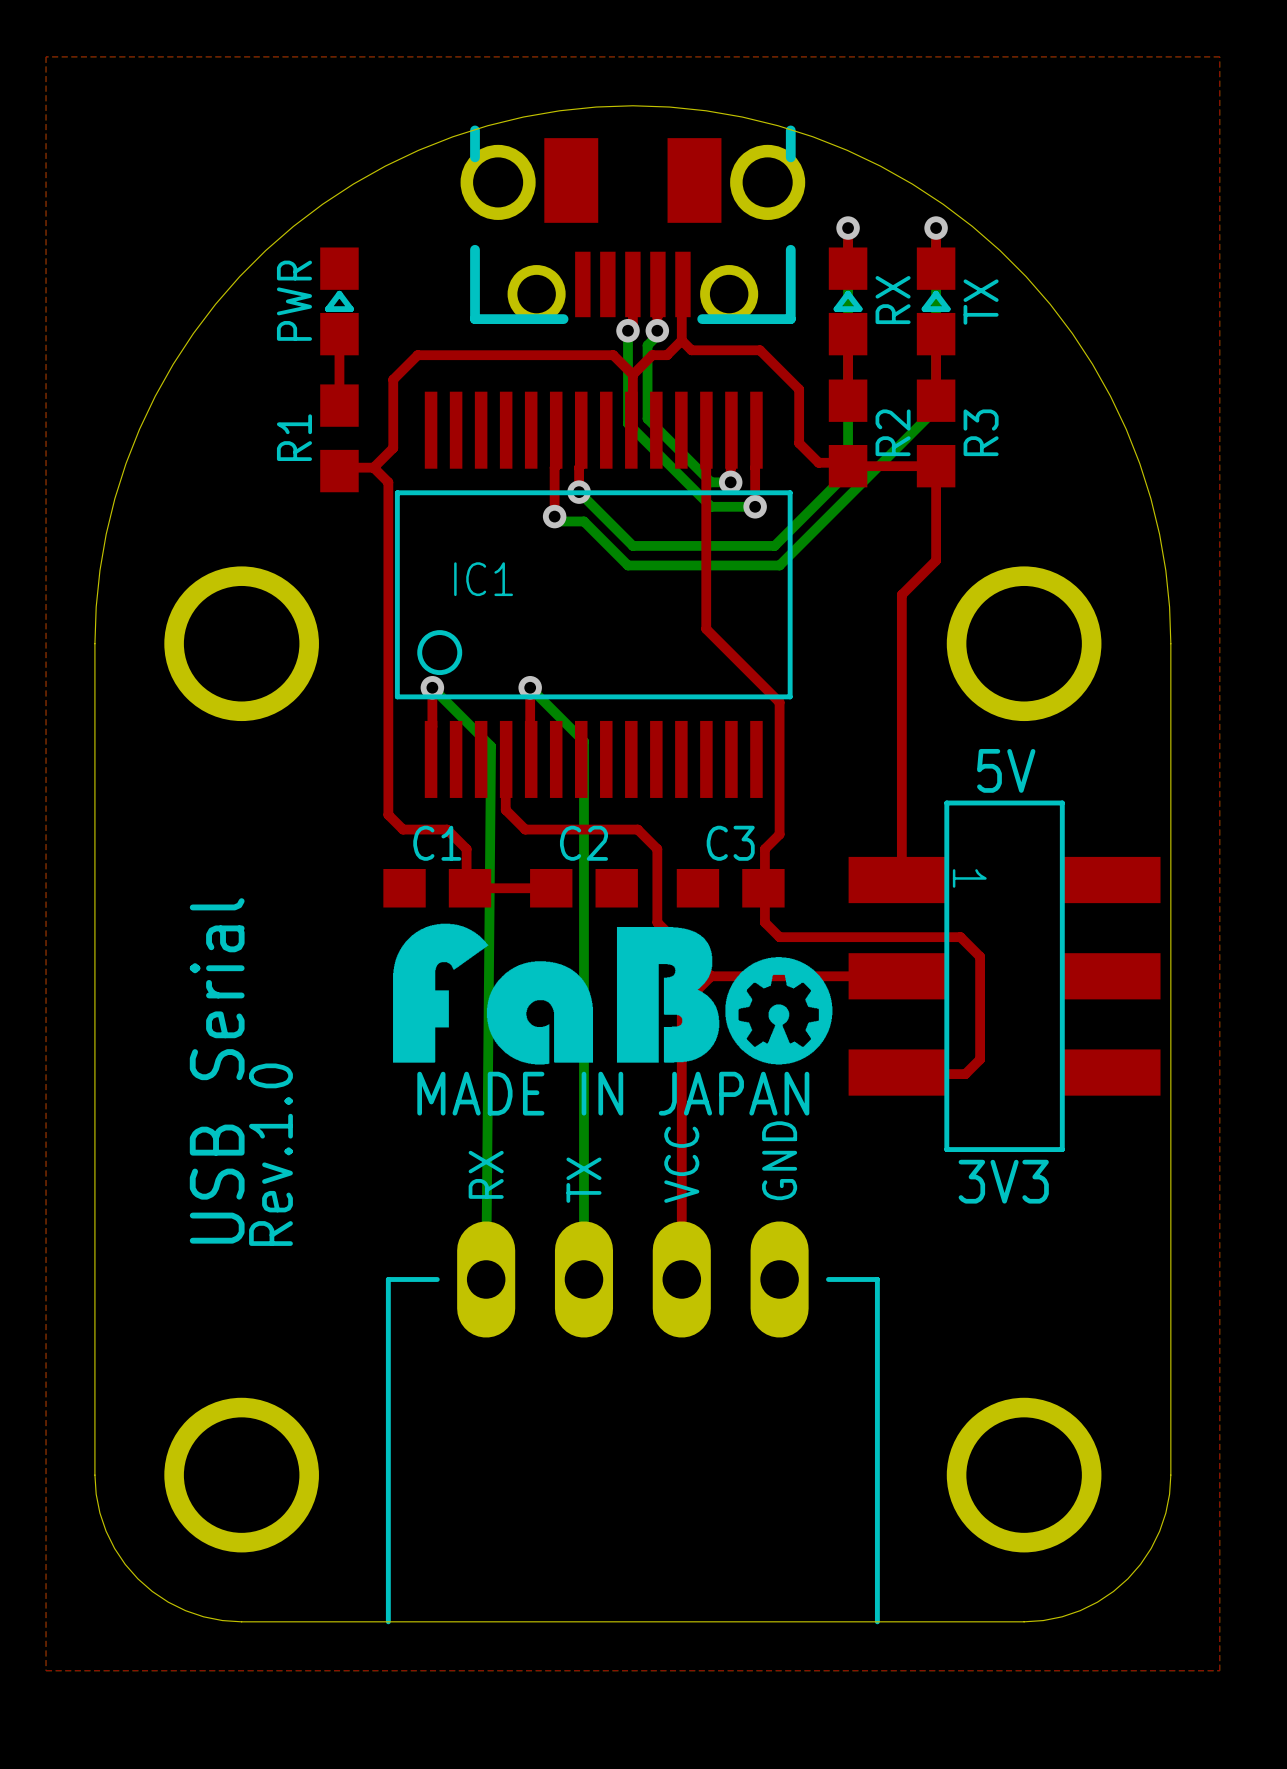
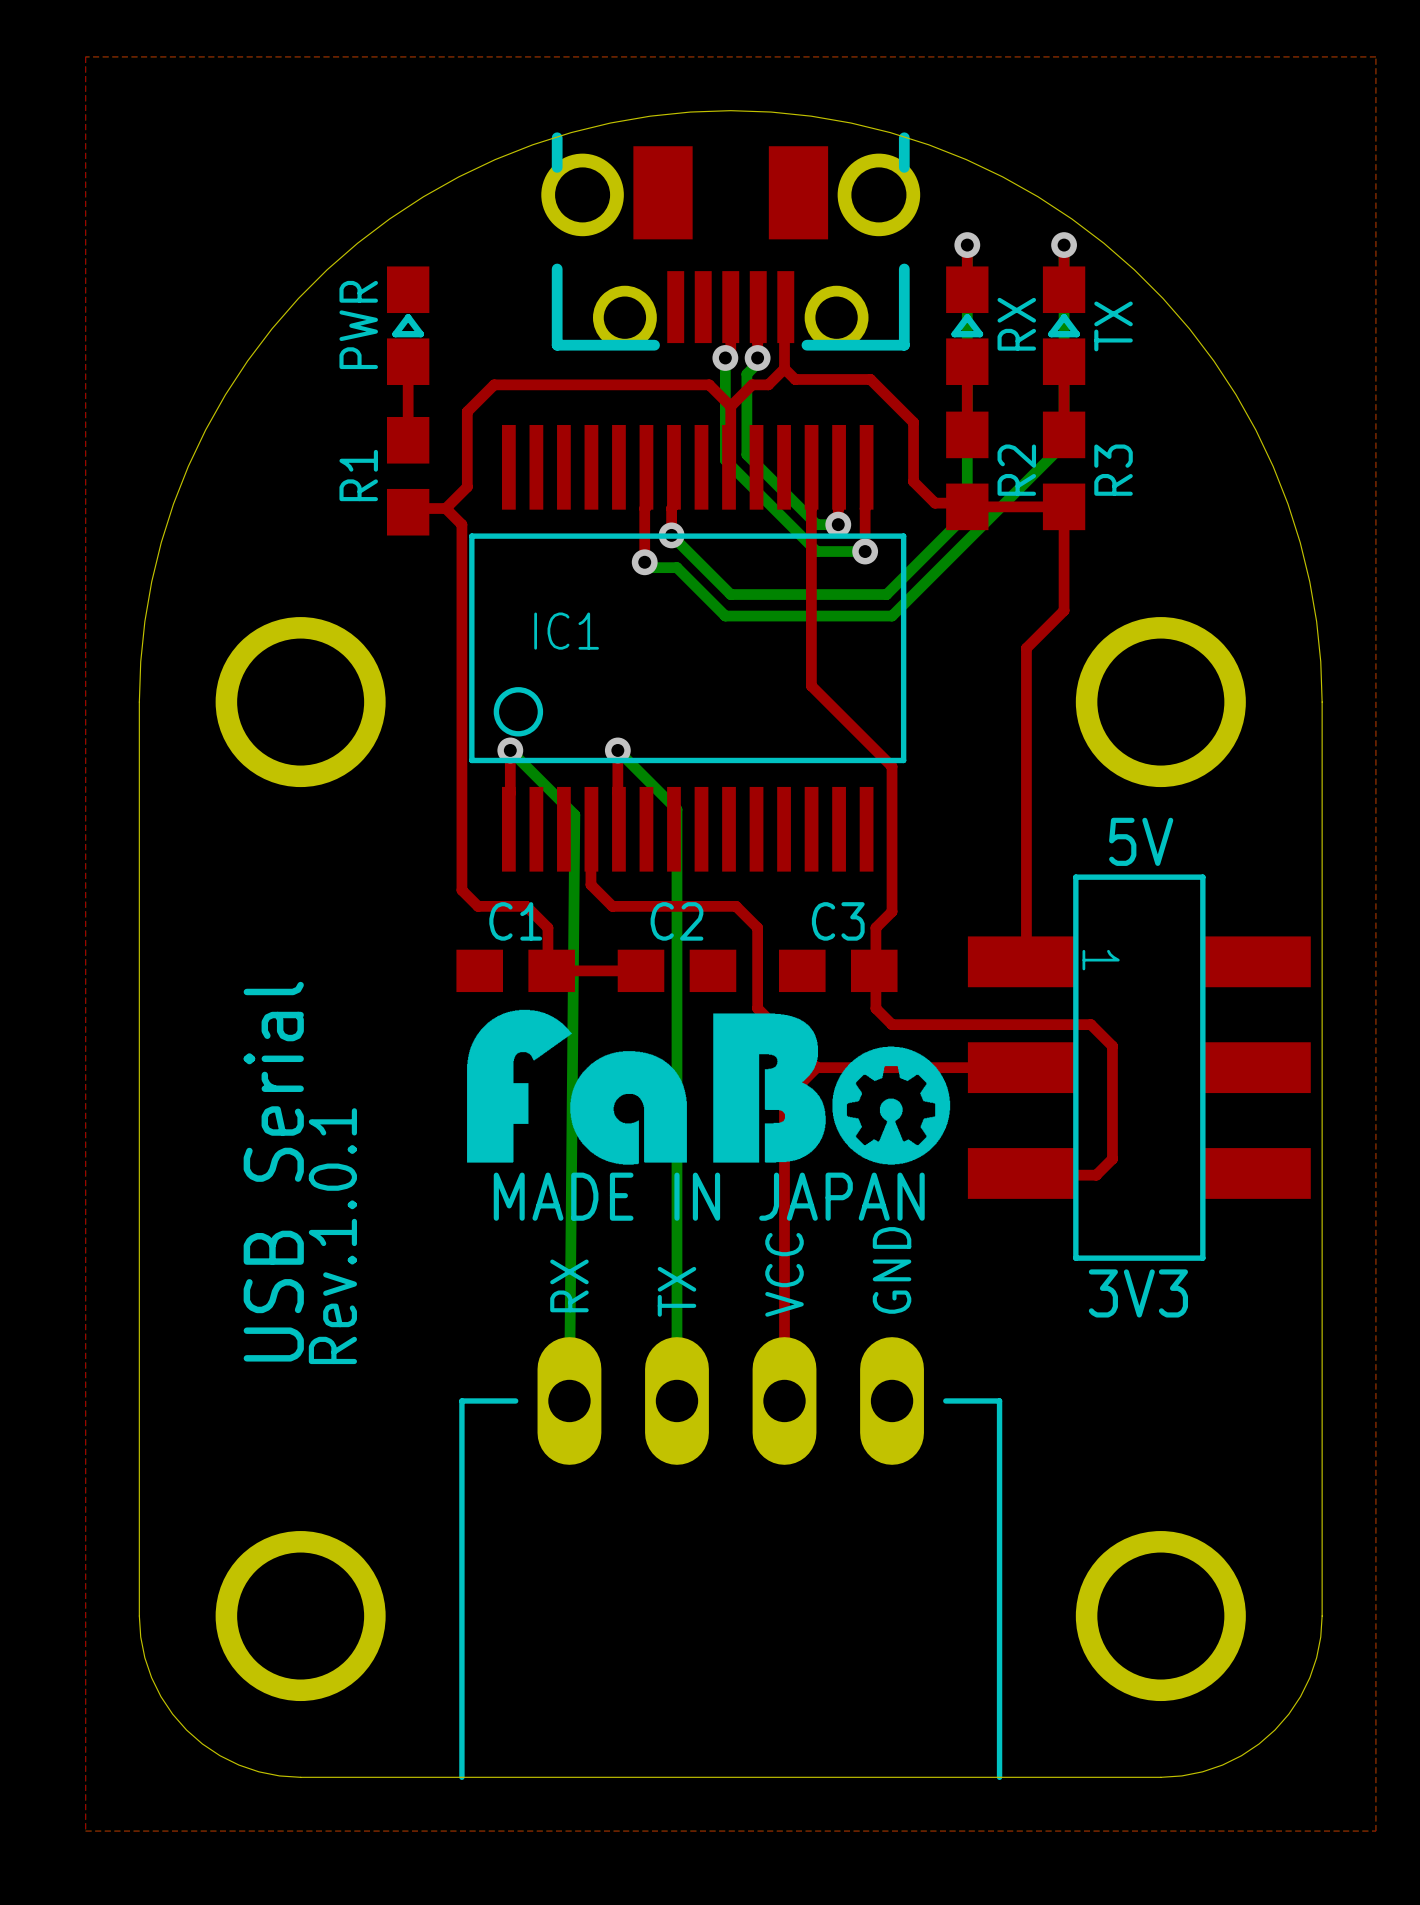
text: Rev.1.0 (270, 1154) -> Rev.1.0.1 (332, 1236)

